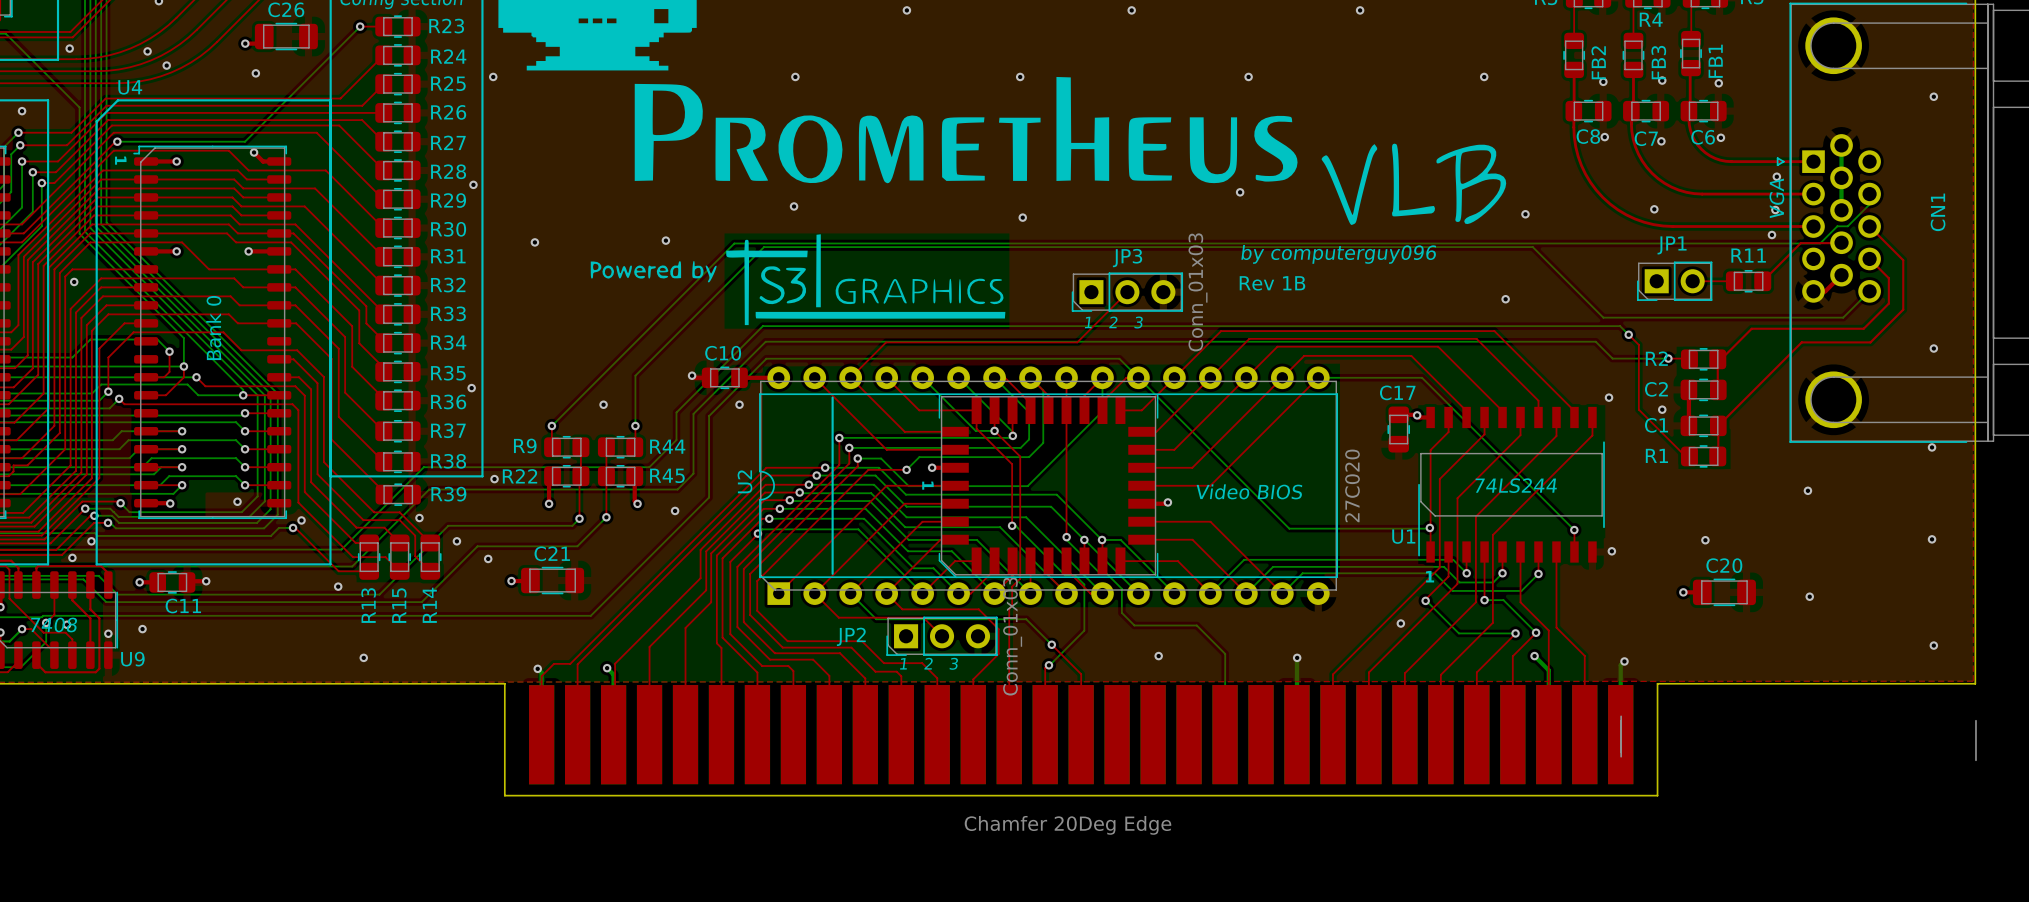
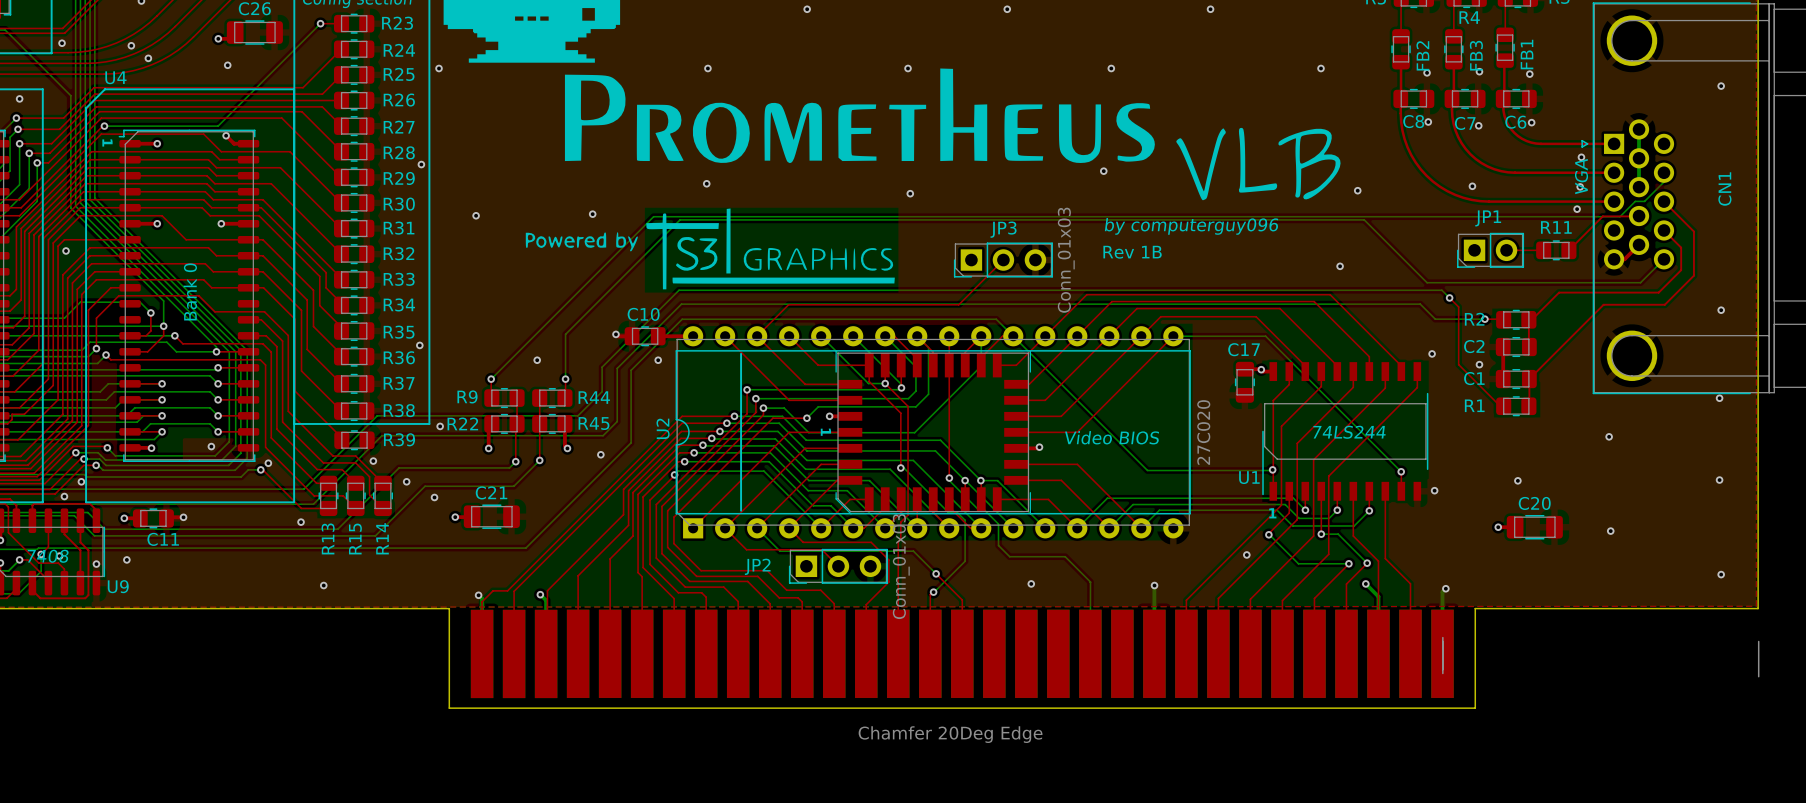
text: 1 2 3 (1113, 322) -> none
text: 1 2 3 (929, 663) -> none

